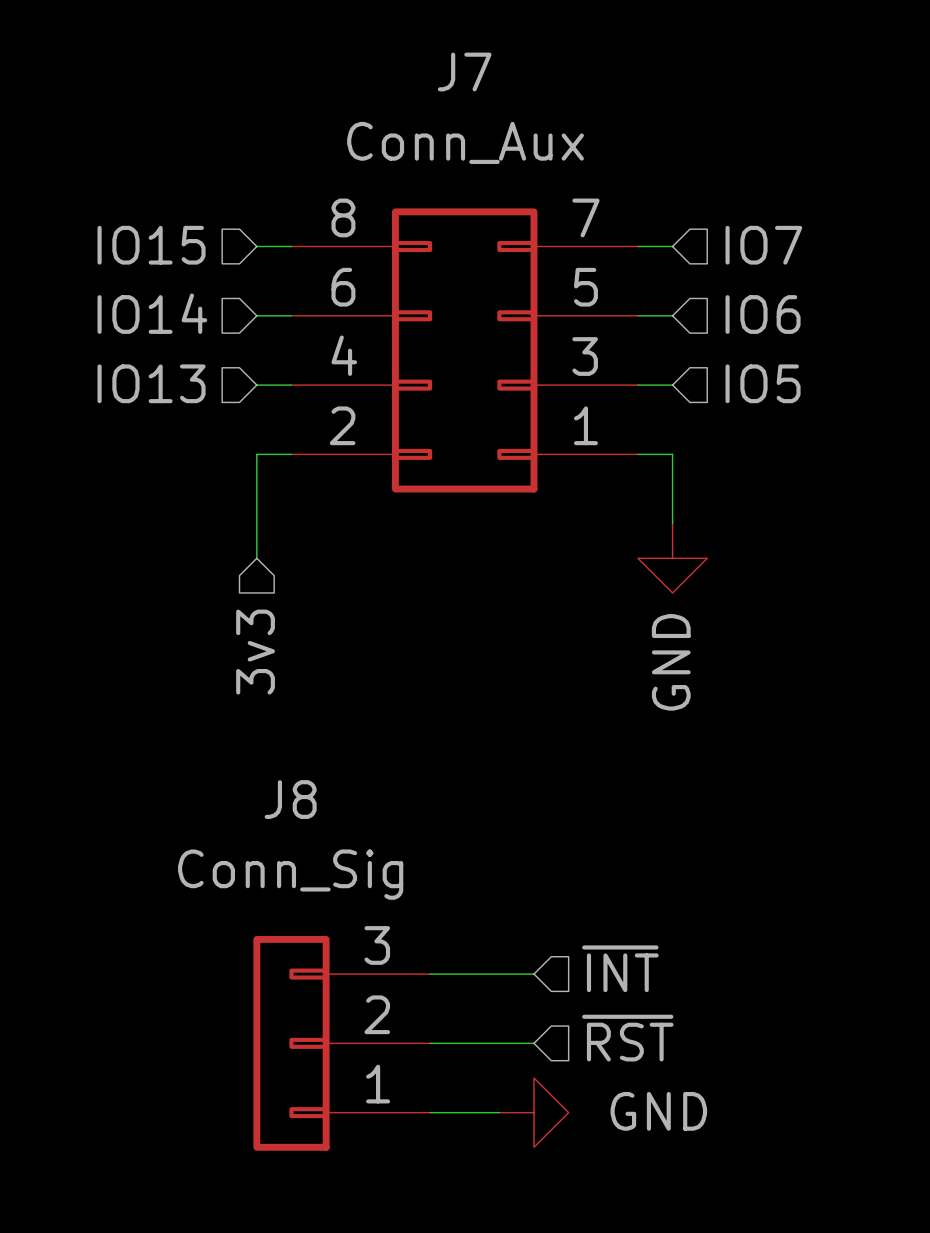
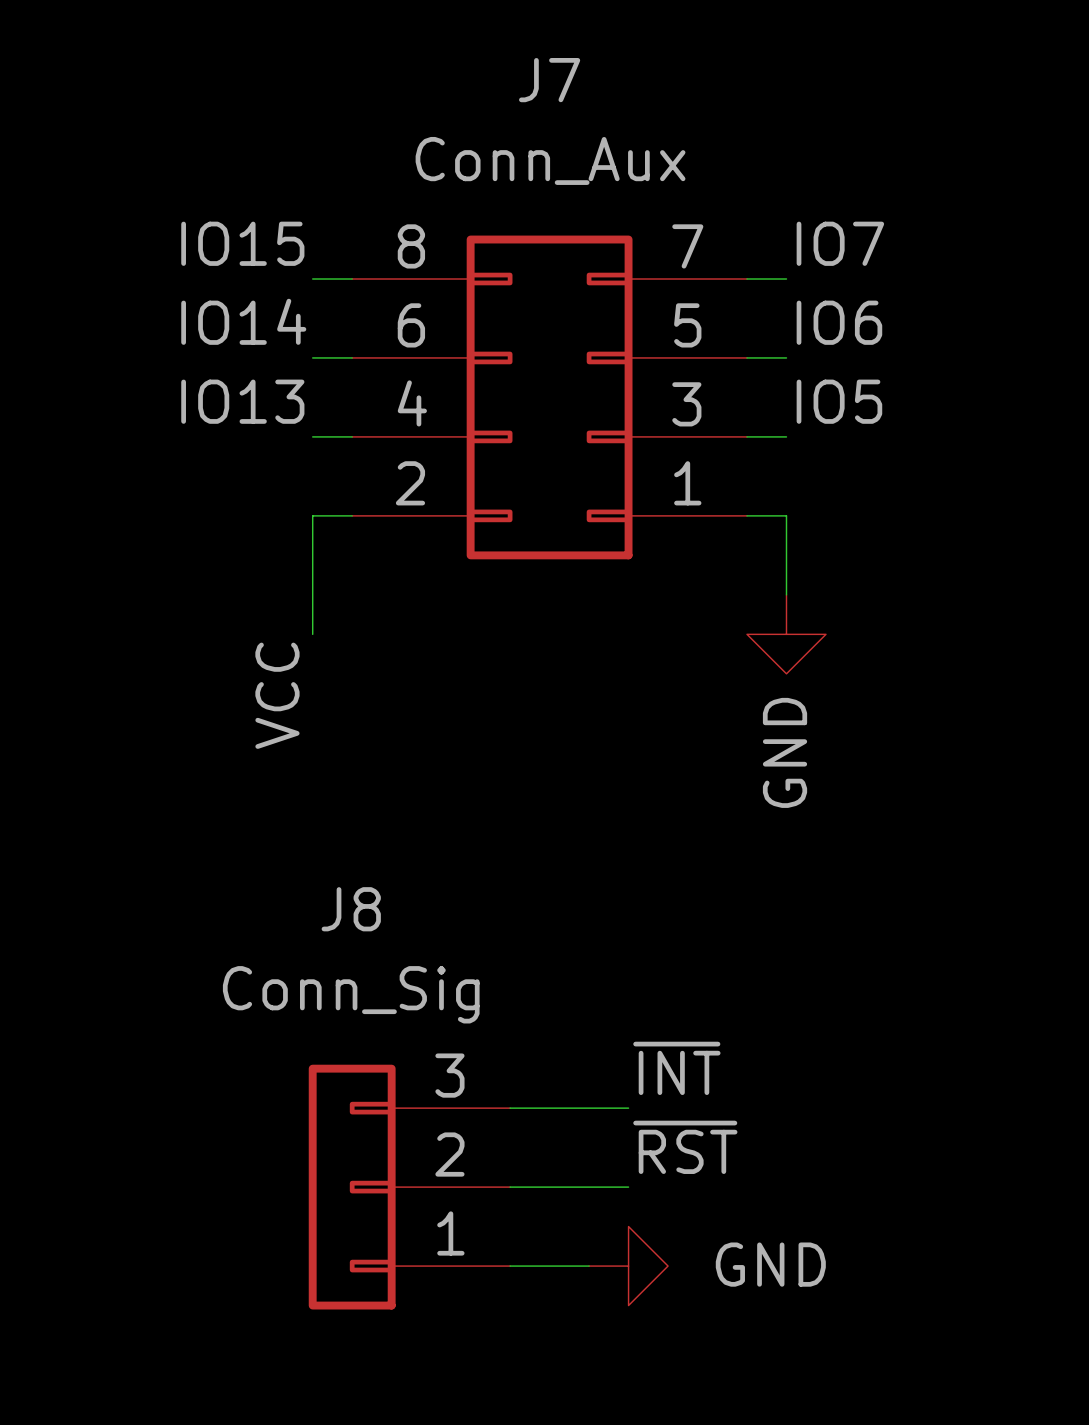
label: none -> IO15 (242, 243)
label: none -> IO7 (840, 243)
hierarchical label: IO15 (151, 245) -> none
hierarchical label: IO7 (763, 245) -> none
label: none -> IO14 (243, 321)
label: none -> IO6 (839, 322)
hierarchical label: IO14 (152, 313) -> none
hierarchical label: IO6 (763, 314) -> none
label: none -> IO13 (242, 401)
label: none -> IO5 (839, 401)
hierarchical label: IO13 (151, 383) -> none
hierarchical label: IO5 (763, 383) -> none
label: none -> VCC (277, 695)
hierarchical label: 3v3 (255, 652) -> none
label: none -> ~{INT} (676, 1068)
hierarchical label: ~{INT} (620, 968) -> none
label: none -> ~{RST} (685, 1147)
hierarchical label: ~{RST} (627, 1038) -> none

